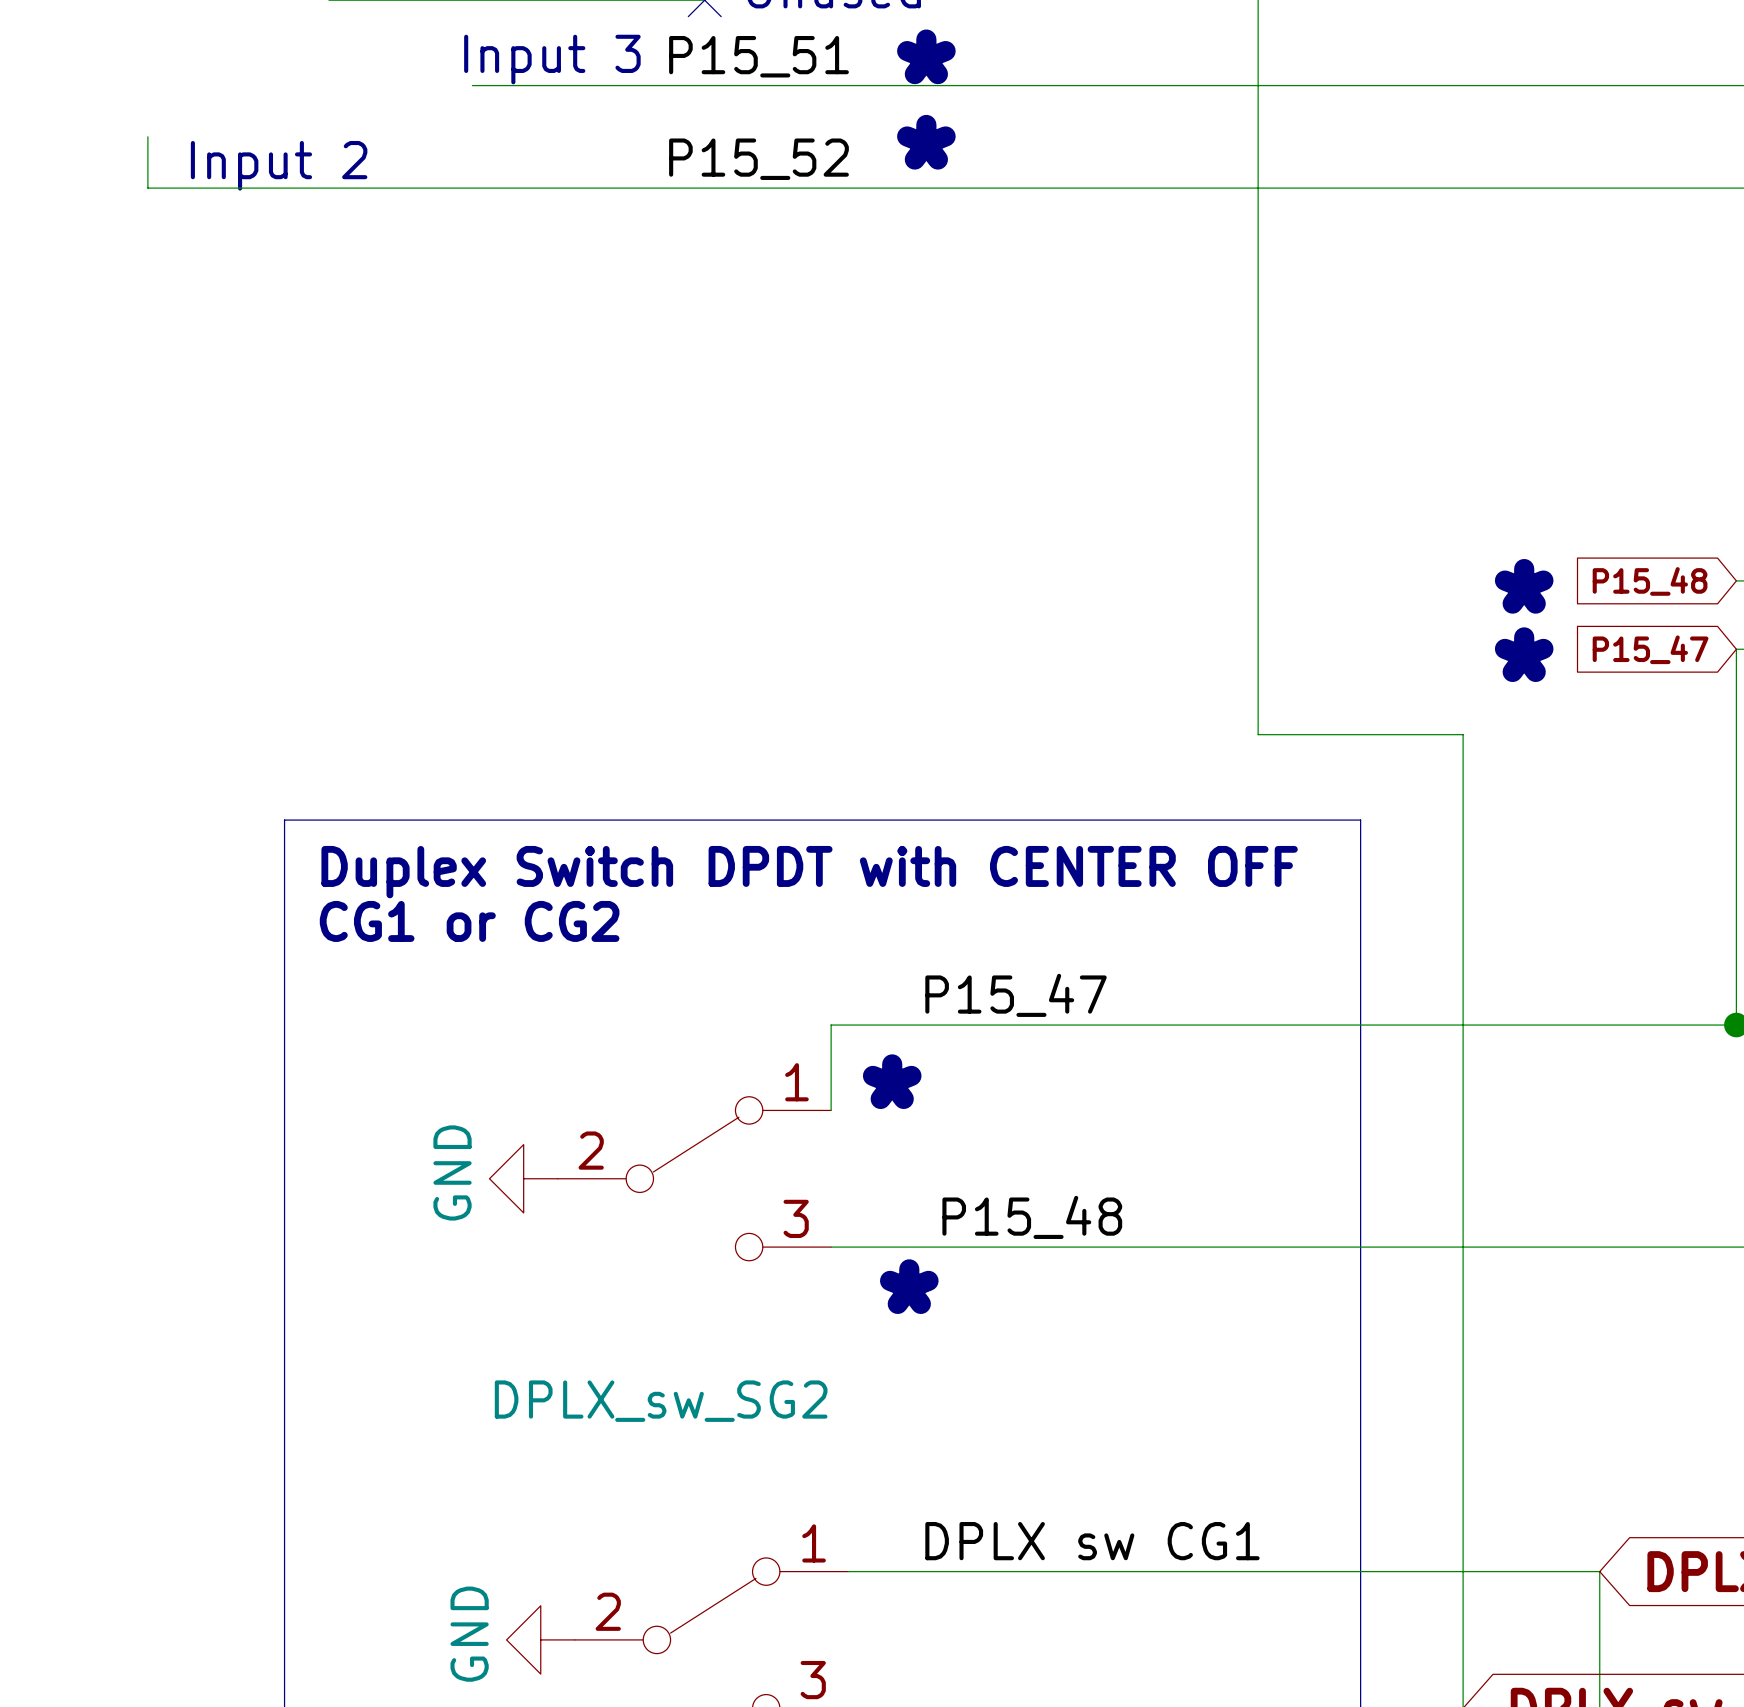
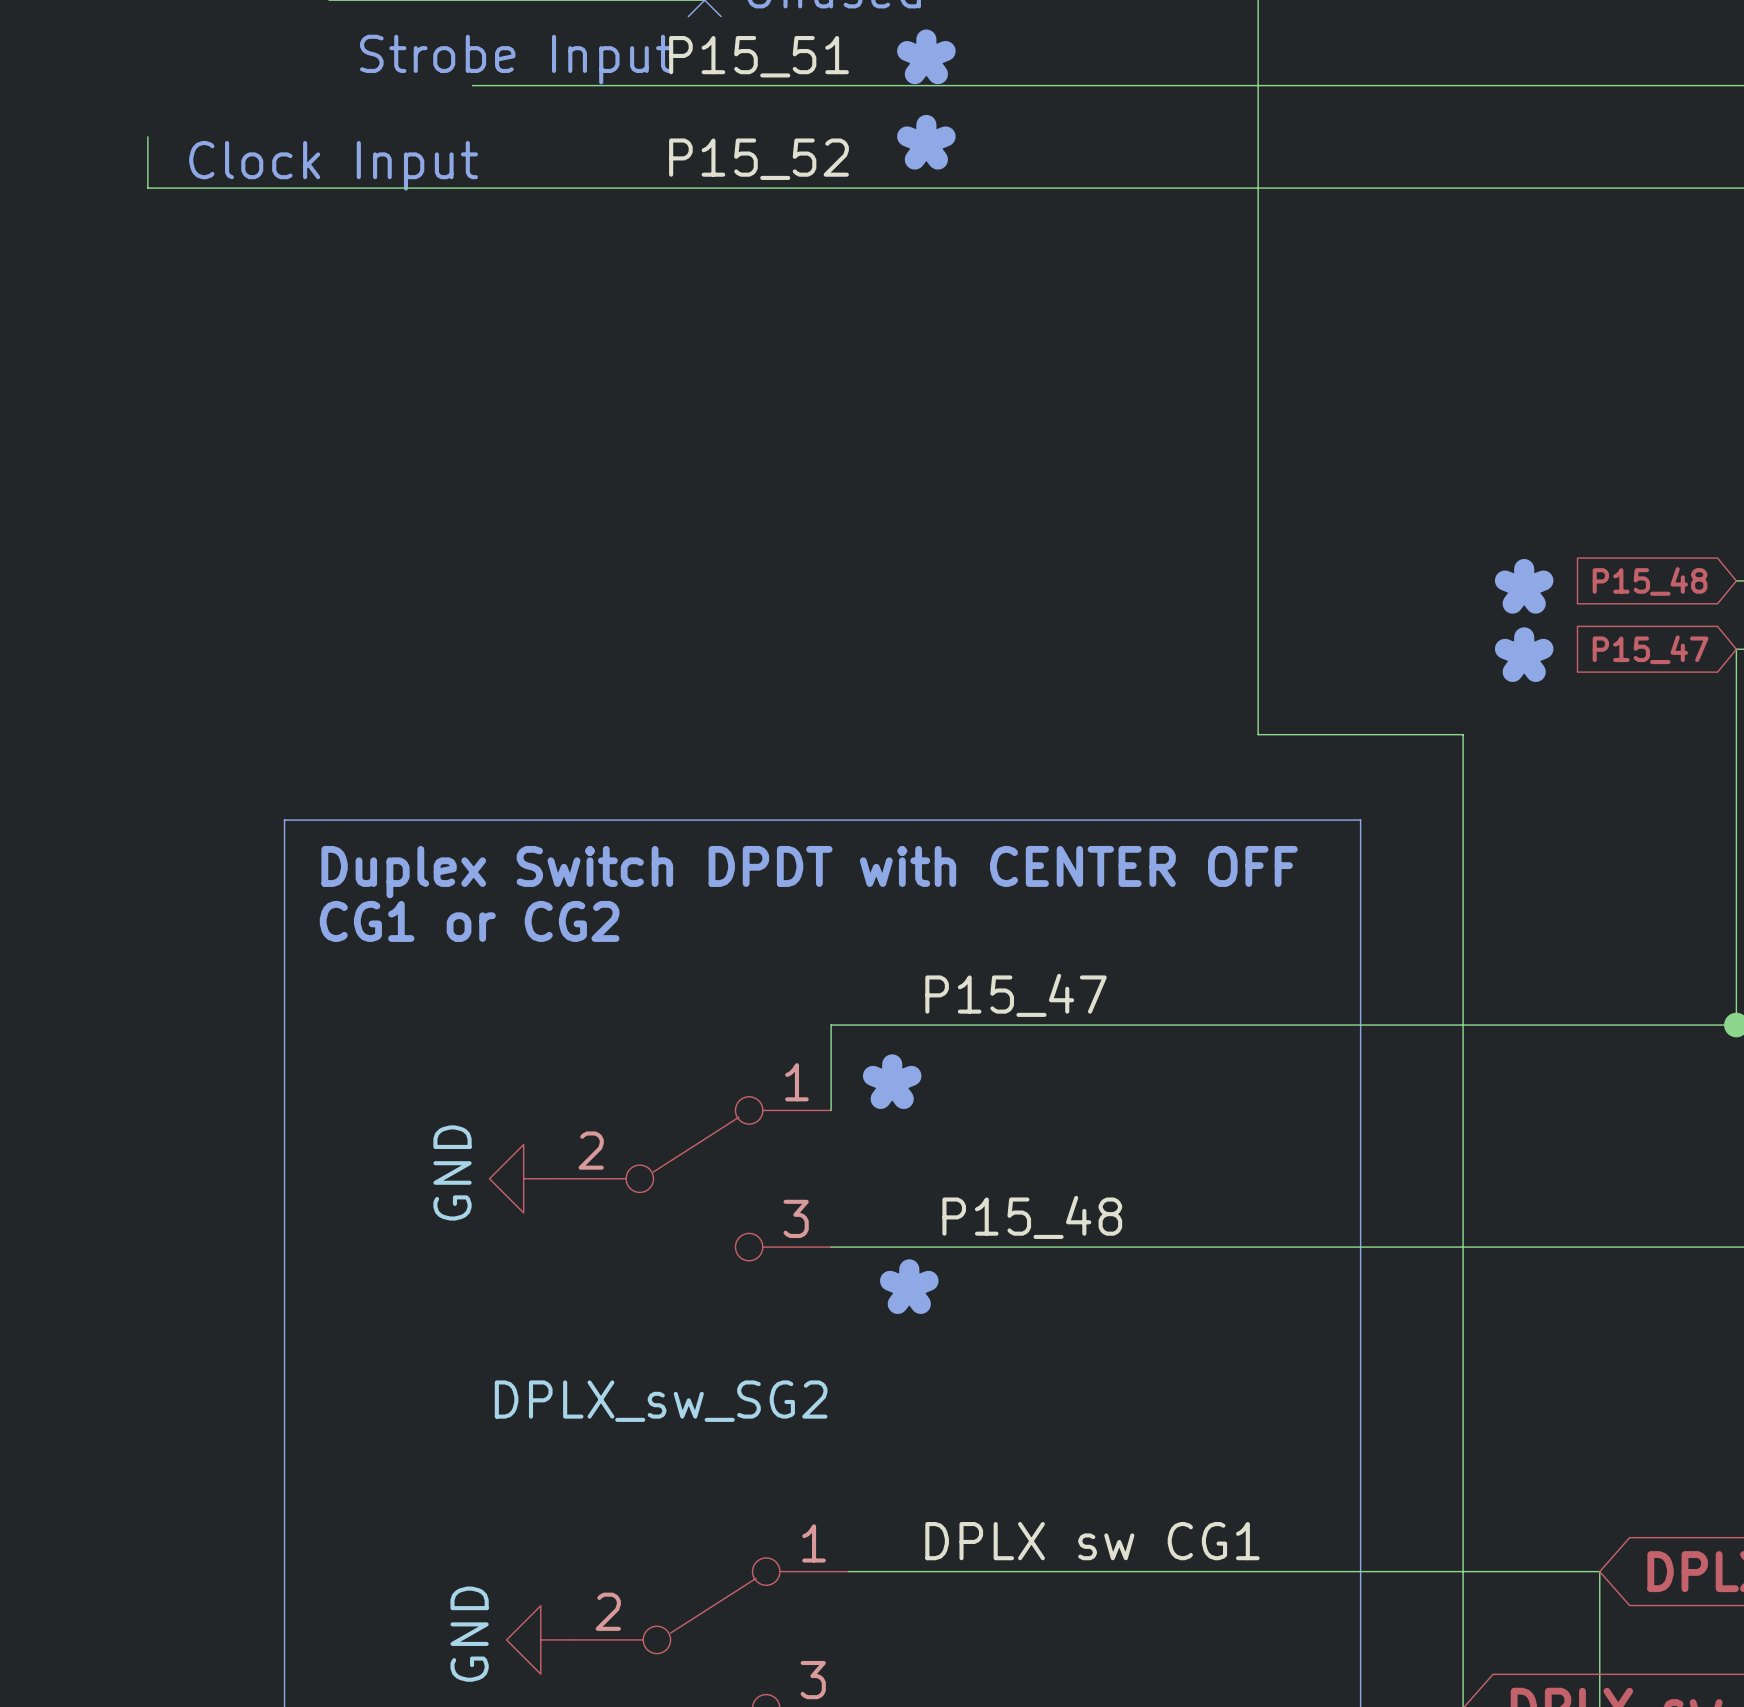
text: none -> Strobe Input (516, 59)
text: Input 3 (552, 59) -> none
text: Input 2 (279, 165) -> Clock Input (333, 165)

